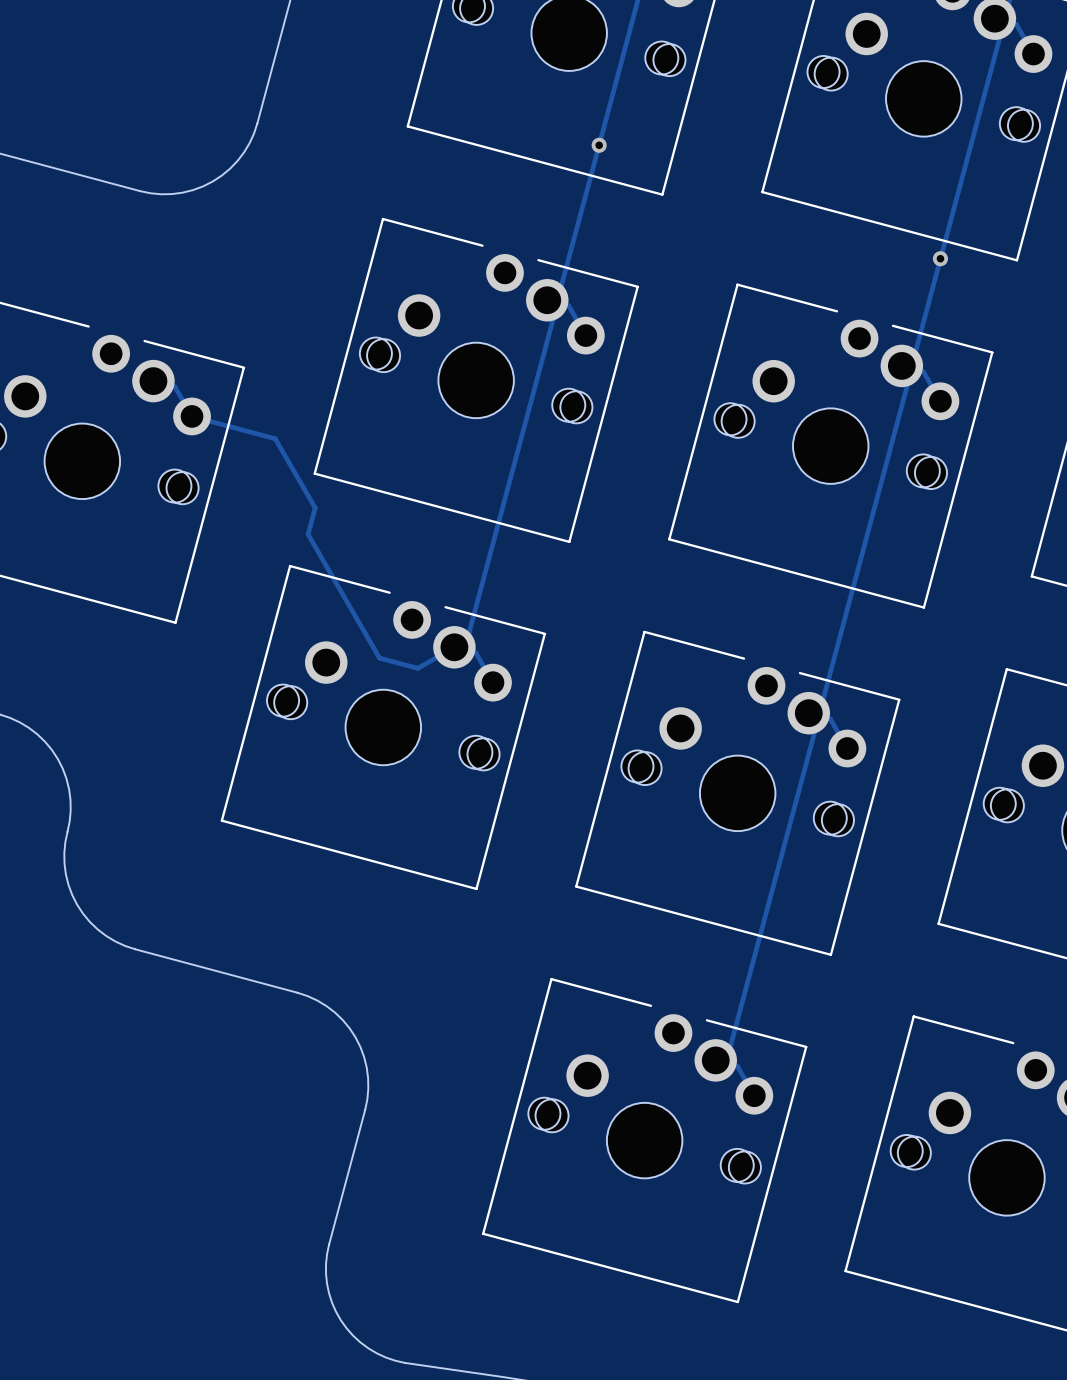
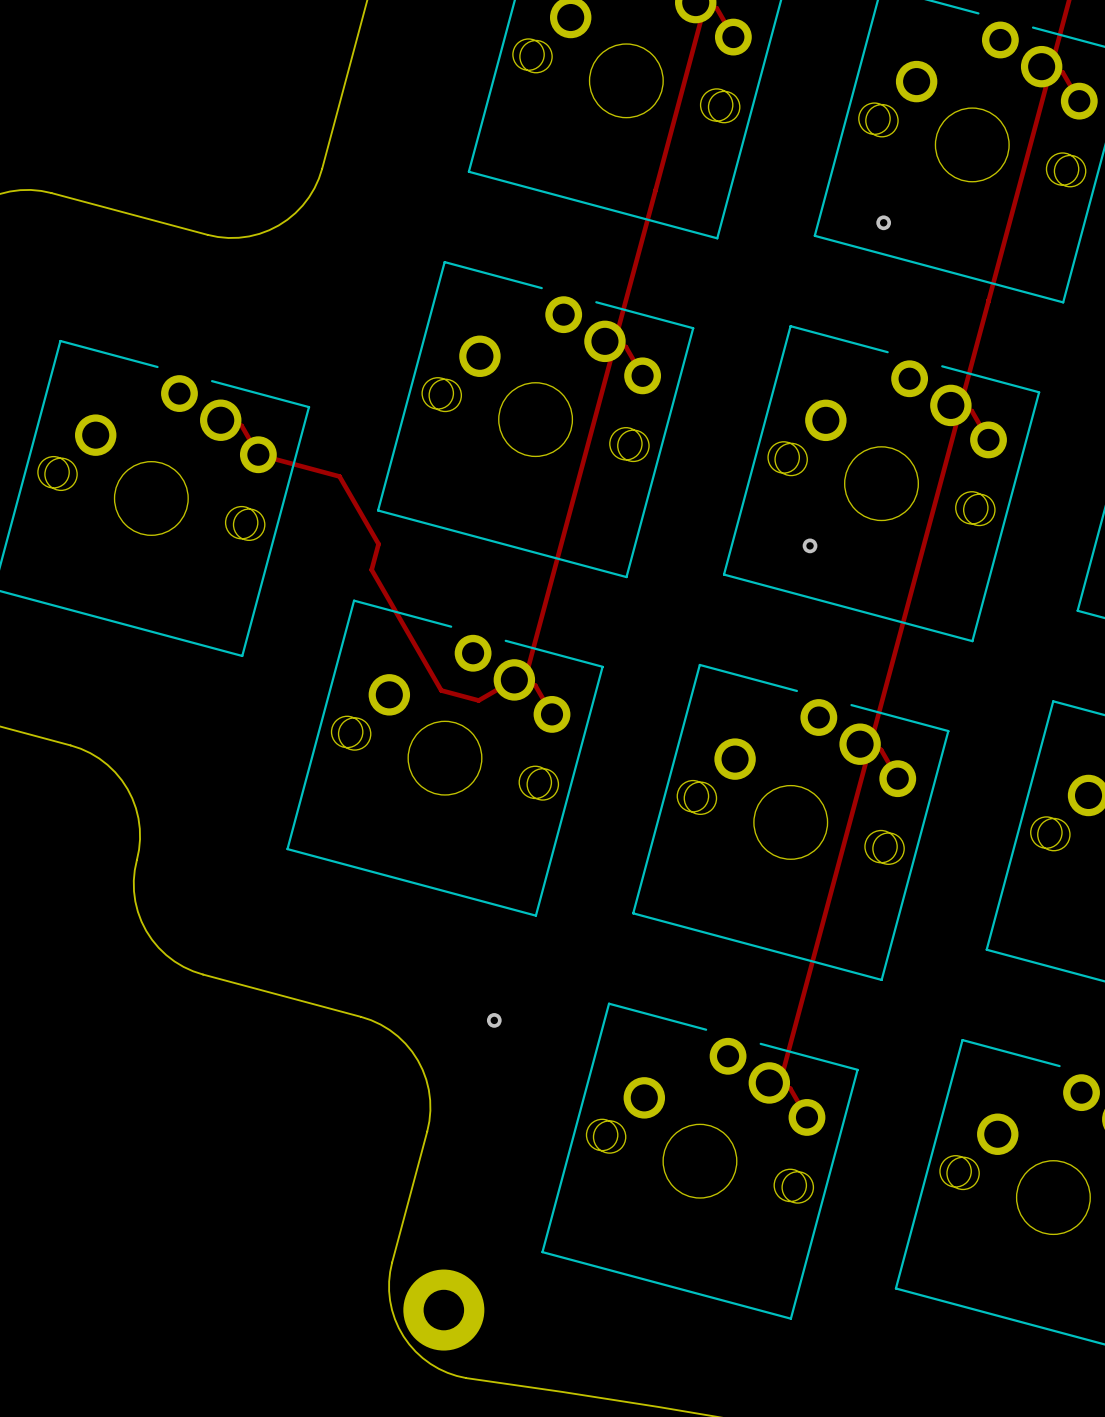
via: (599, 145) -> none
via: none -> (883, 222)
via: (940, 258) -> none
via: none -> (810, 545)
via: none -> (494, 1020)
part: none -> (443, 1310)

